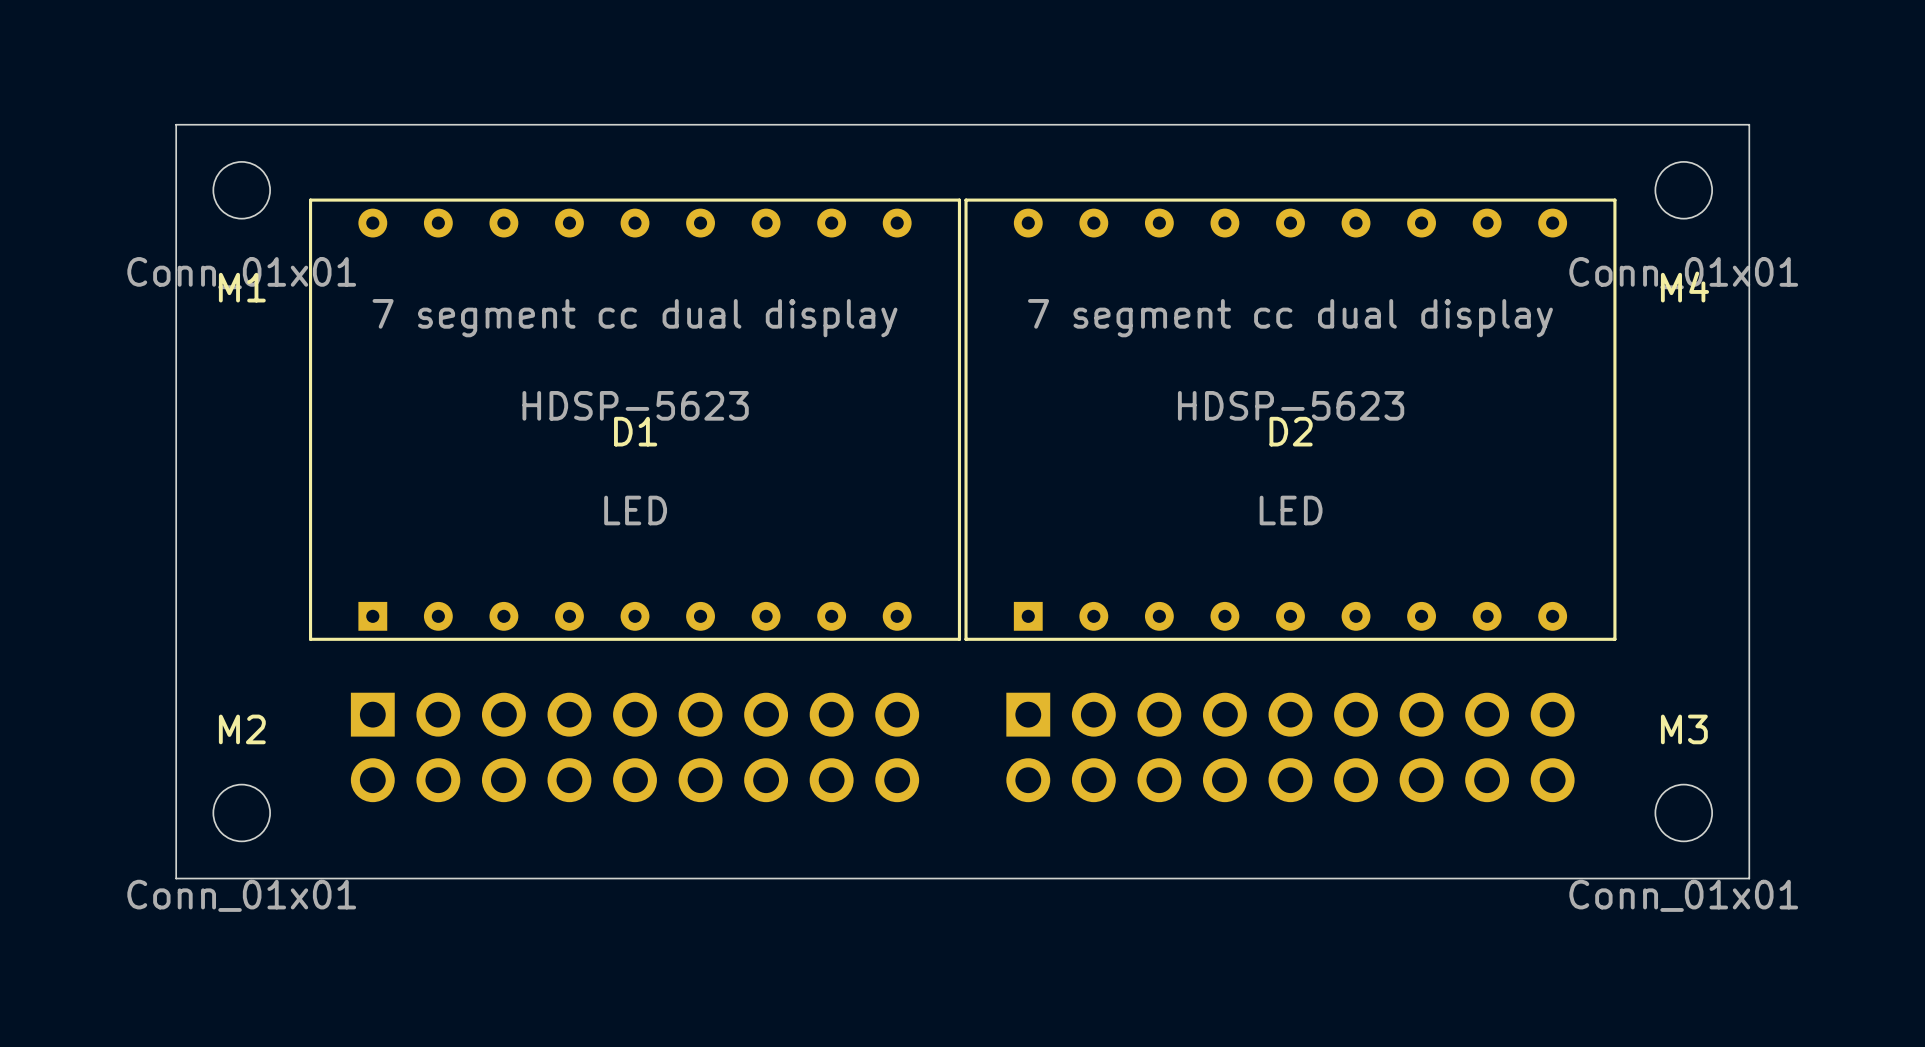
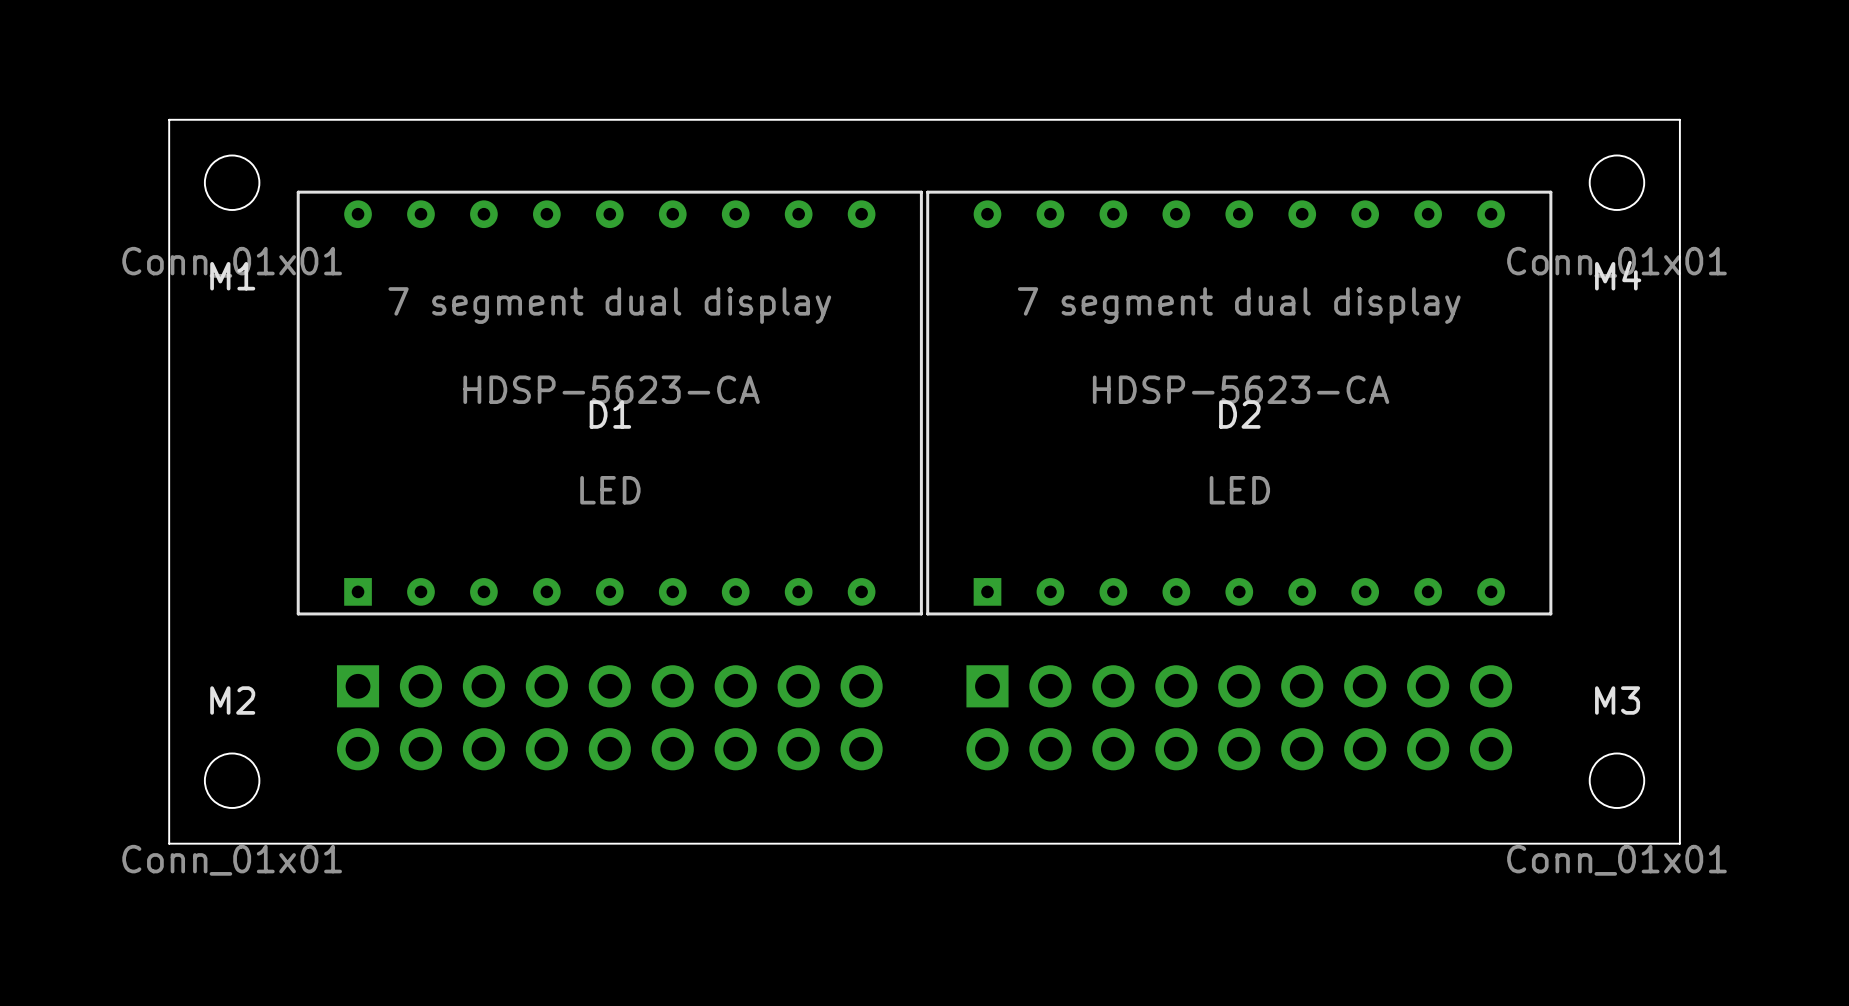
D1 text: 7 segment cc dual display (635, 318) -> 7 segment dual display (609, 305)
D2 text: 7 segment cc dual display (1290, 318) -> 7 segment dual display (1239, 305)
D1 value: HDSP-5623 (635, 405) -> HDSP-5623-CA (611, 389)
D2 value: HDSP-5623 (1291, 405) -> HDSP-5623-CA (1241, 389)

